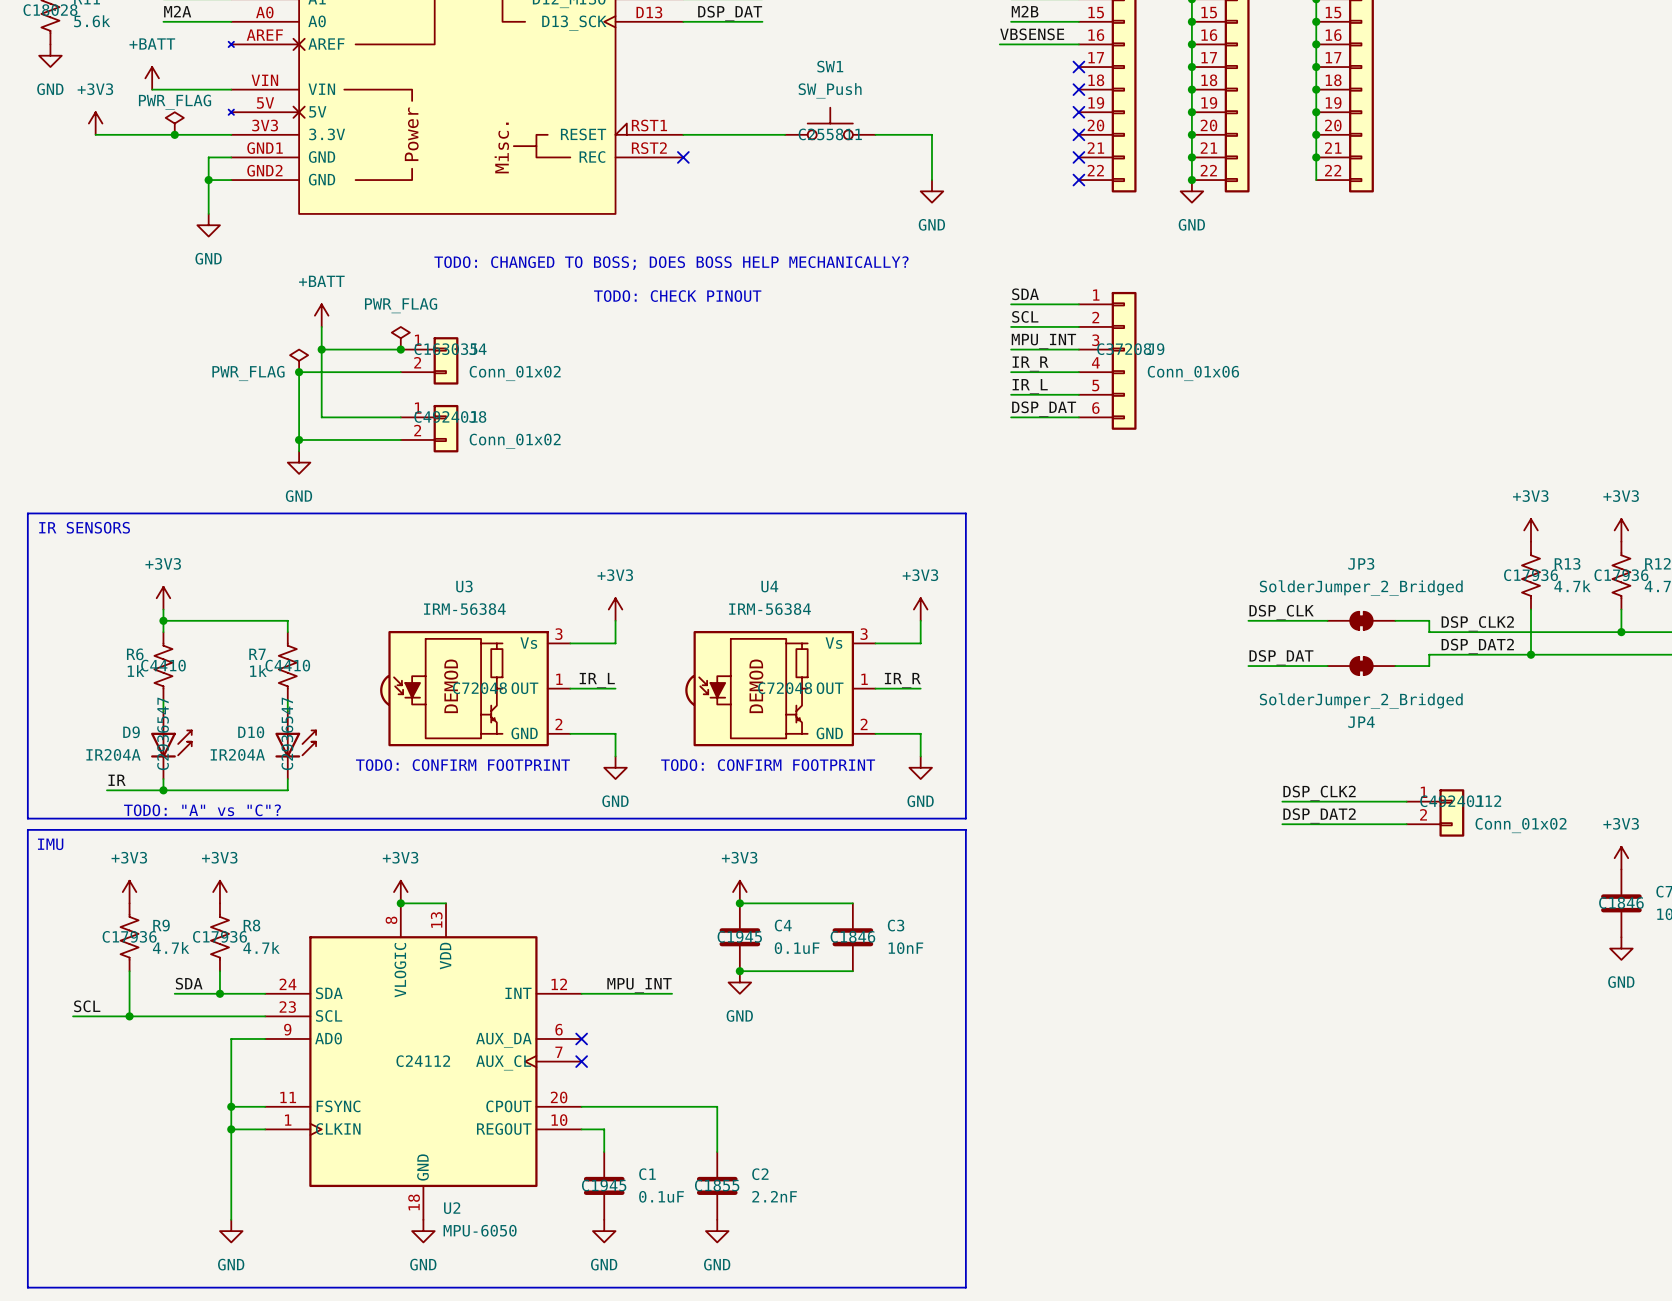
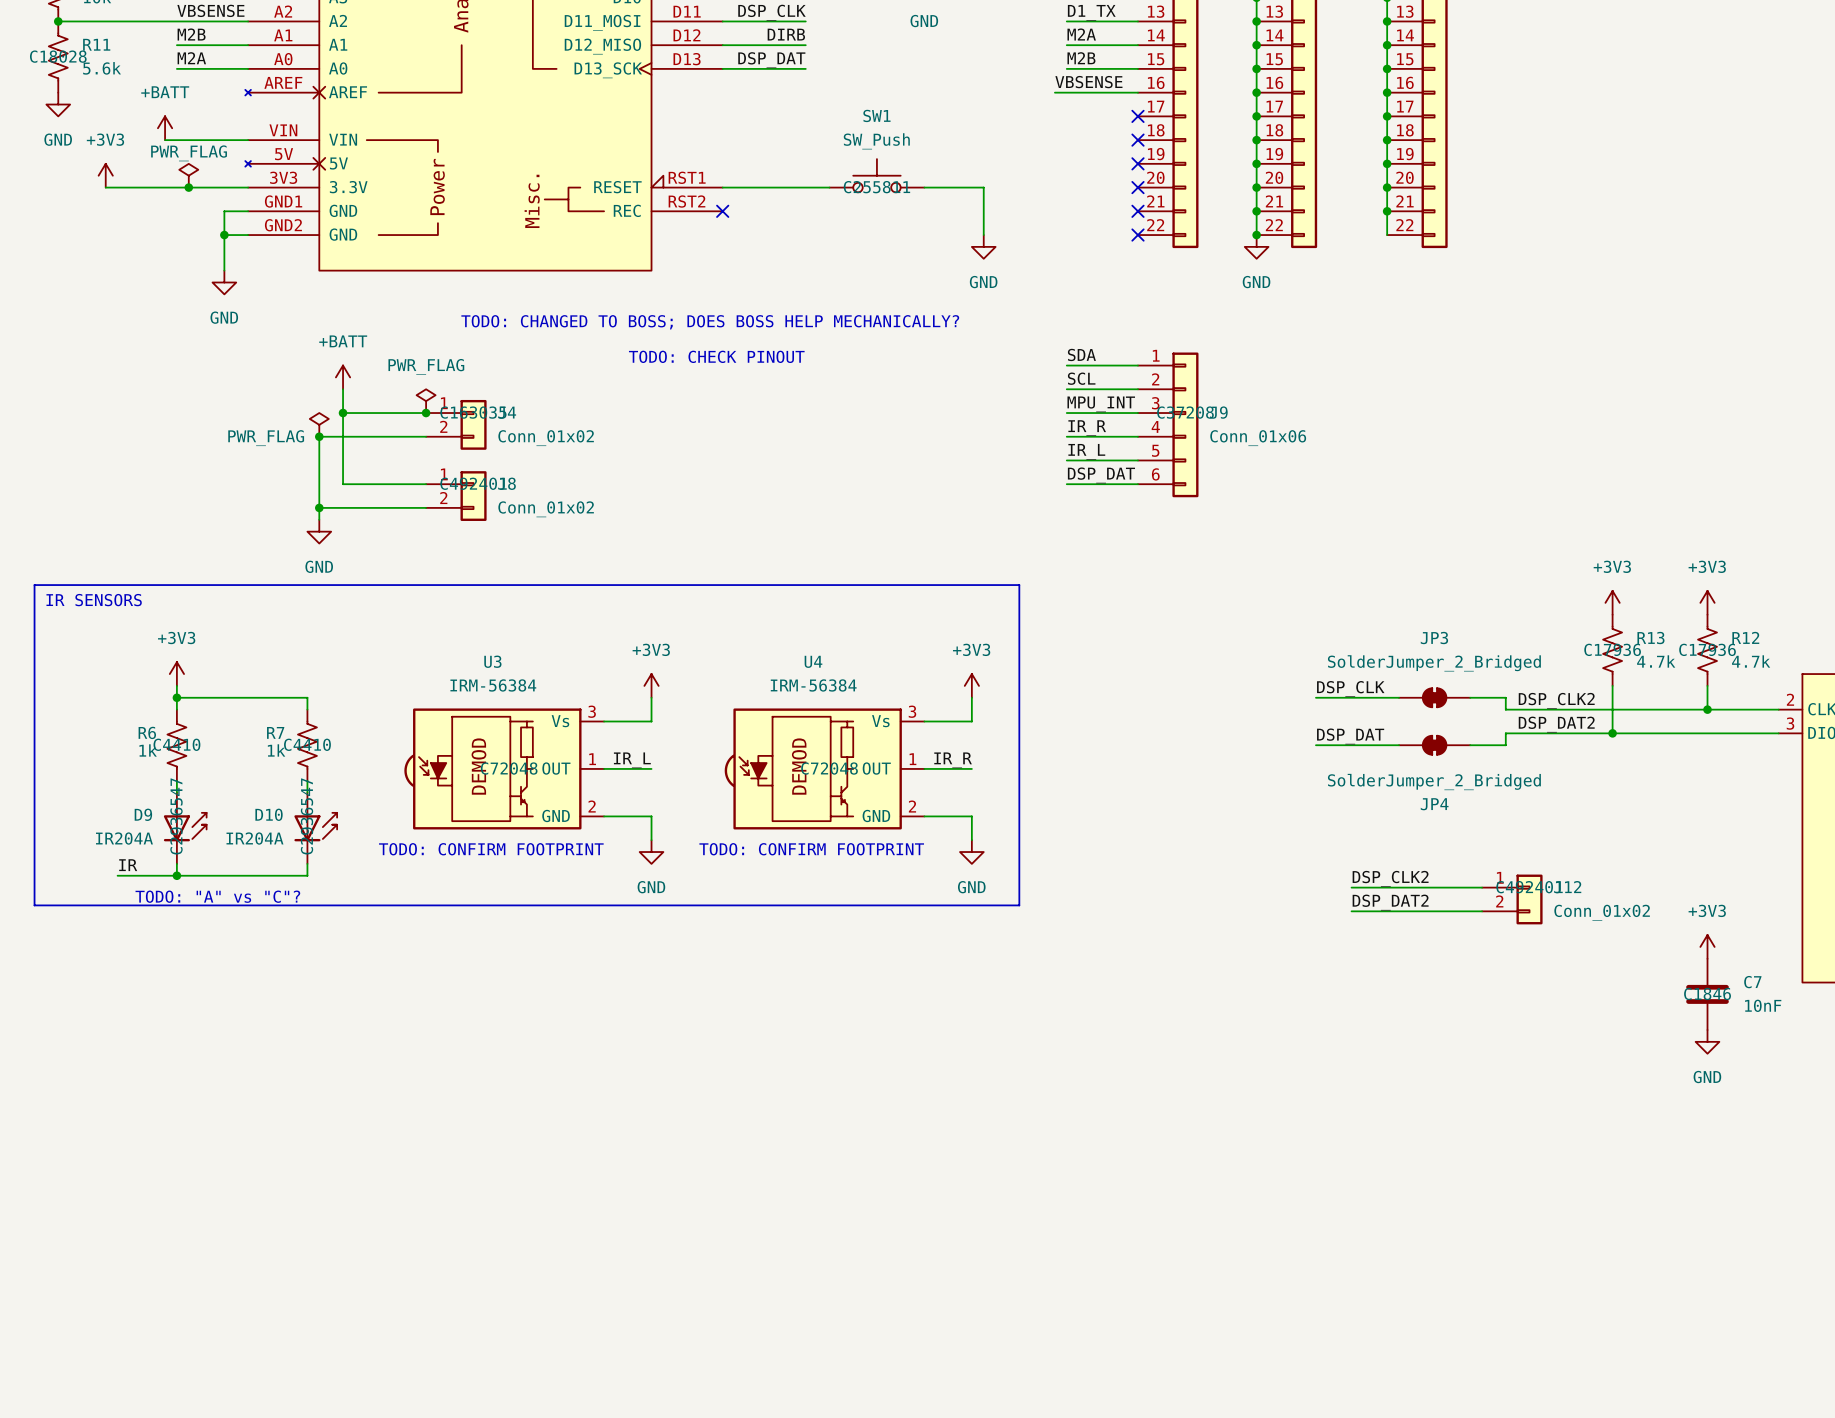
line: (27, 829) (965, 829) (965, 1287) (27, 1287) (27, 829) -> none
text: IMU (50, 844) -> none
power symbol: +3V3 (129, 892) -> none
power symbol: +3V3 (219, 892) -> none
power symbol: +3V3 (400, 892) -> none
power symbol: +3V3 (739, 892) -> none
wire: (400, 903) (446, 903) -> none
junction: (400, 903) -> none
wire: (739, 903) (852, 903) -> none
junction: (739, 903) -> none
R9: 4.7k (129, 937) -> none
R8: 4.7k (219, 937) -> none
C4: 0.1uF (739, 937) -> none
C3: 10nF (852, 937) -> none
wire: (129, 971) (129, 1016) -> none
wire: (219, 971) (219, 993) -> none
wire: (739, 971) (852, 971) -> none
junction: (739, 971) -> none
power symbol: GND (739, 982) -> none
label: SDA (189, 983) -> none
label: MPU_INT (639, 985) -> none
wire: (174, 993) (265, 993) -> none
junction: (219, 993) -> none
wire: (581, 993) (672, 993) -> none
label: SCL (87, 1006) -> none
wire: (73, 1016) (265, 1016) -> none
junction: (129, 1016) -> none
wire: (265, 1038) (231, 1038) (231, 1219) -> none
no-connect mark: (581, 1038) -> none
U2: MPU-6050 (423, 1061) -> none
no-connect mark: (581, 1061) -> none
wire: (231, 1106) (265, 1106) -> none
junction: (231, 1106) -> none
wire: (581, 1106) (717, 1106) (717, 1152) -> none
wire: (231, 1129) (265, 1129) -> none
junction: (231, 1129) -> none
wire: (581, 1129) (604, 1129) (604, 1152) -> none
C1: 0.1uF (604, 1185) -> none
C2: 2.2nF (717, 1185) -> none
power symbol: GND (231, 1231) -> none
power symbol: GND (423, 1231) -> none
power symbol: GND (604, 1231) -> none
power symbol: GND (717, 1231) -> none

